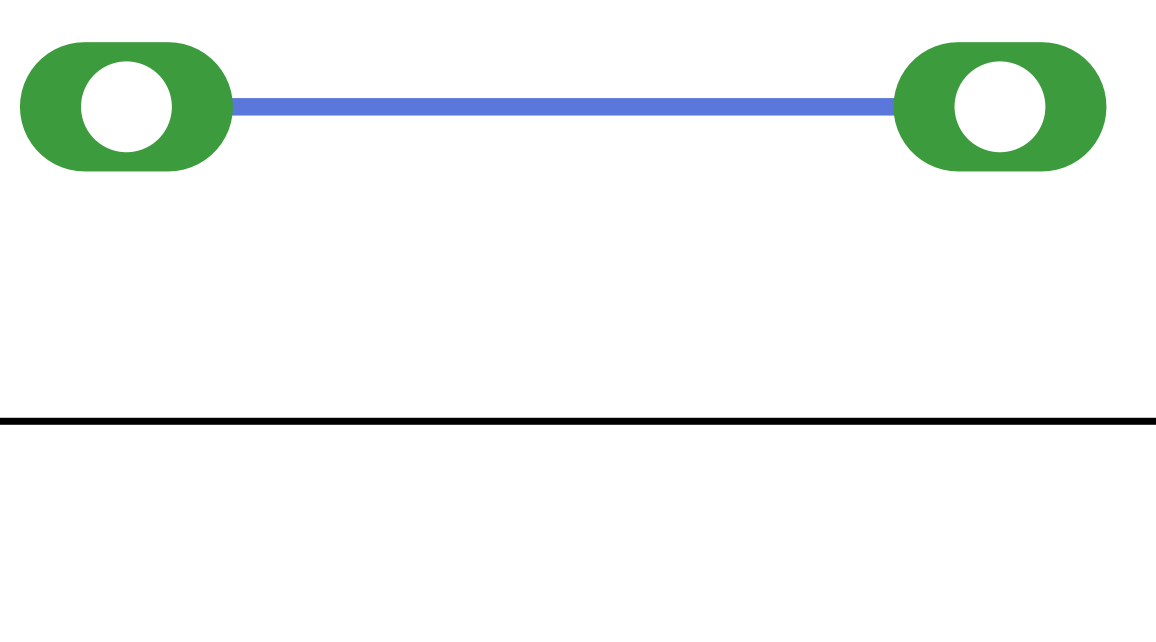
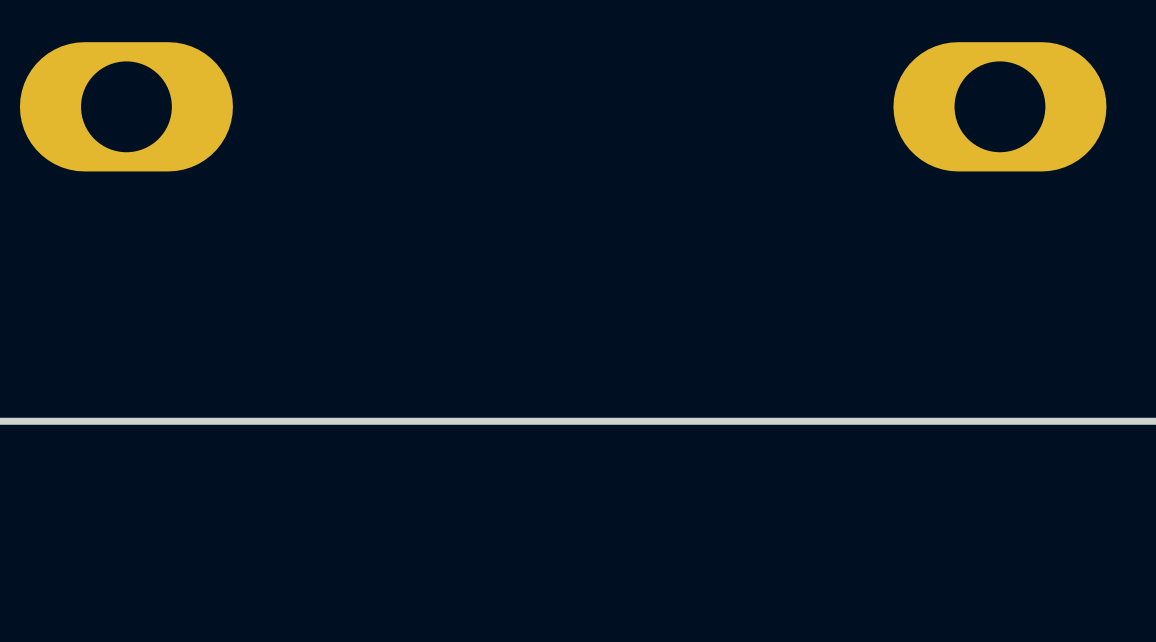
track: (999, 106) (126, 106) -> none

